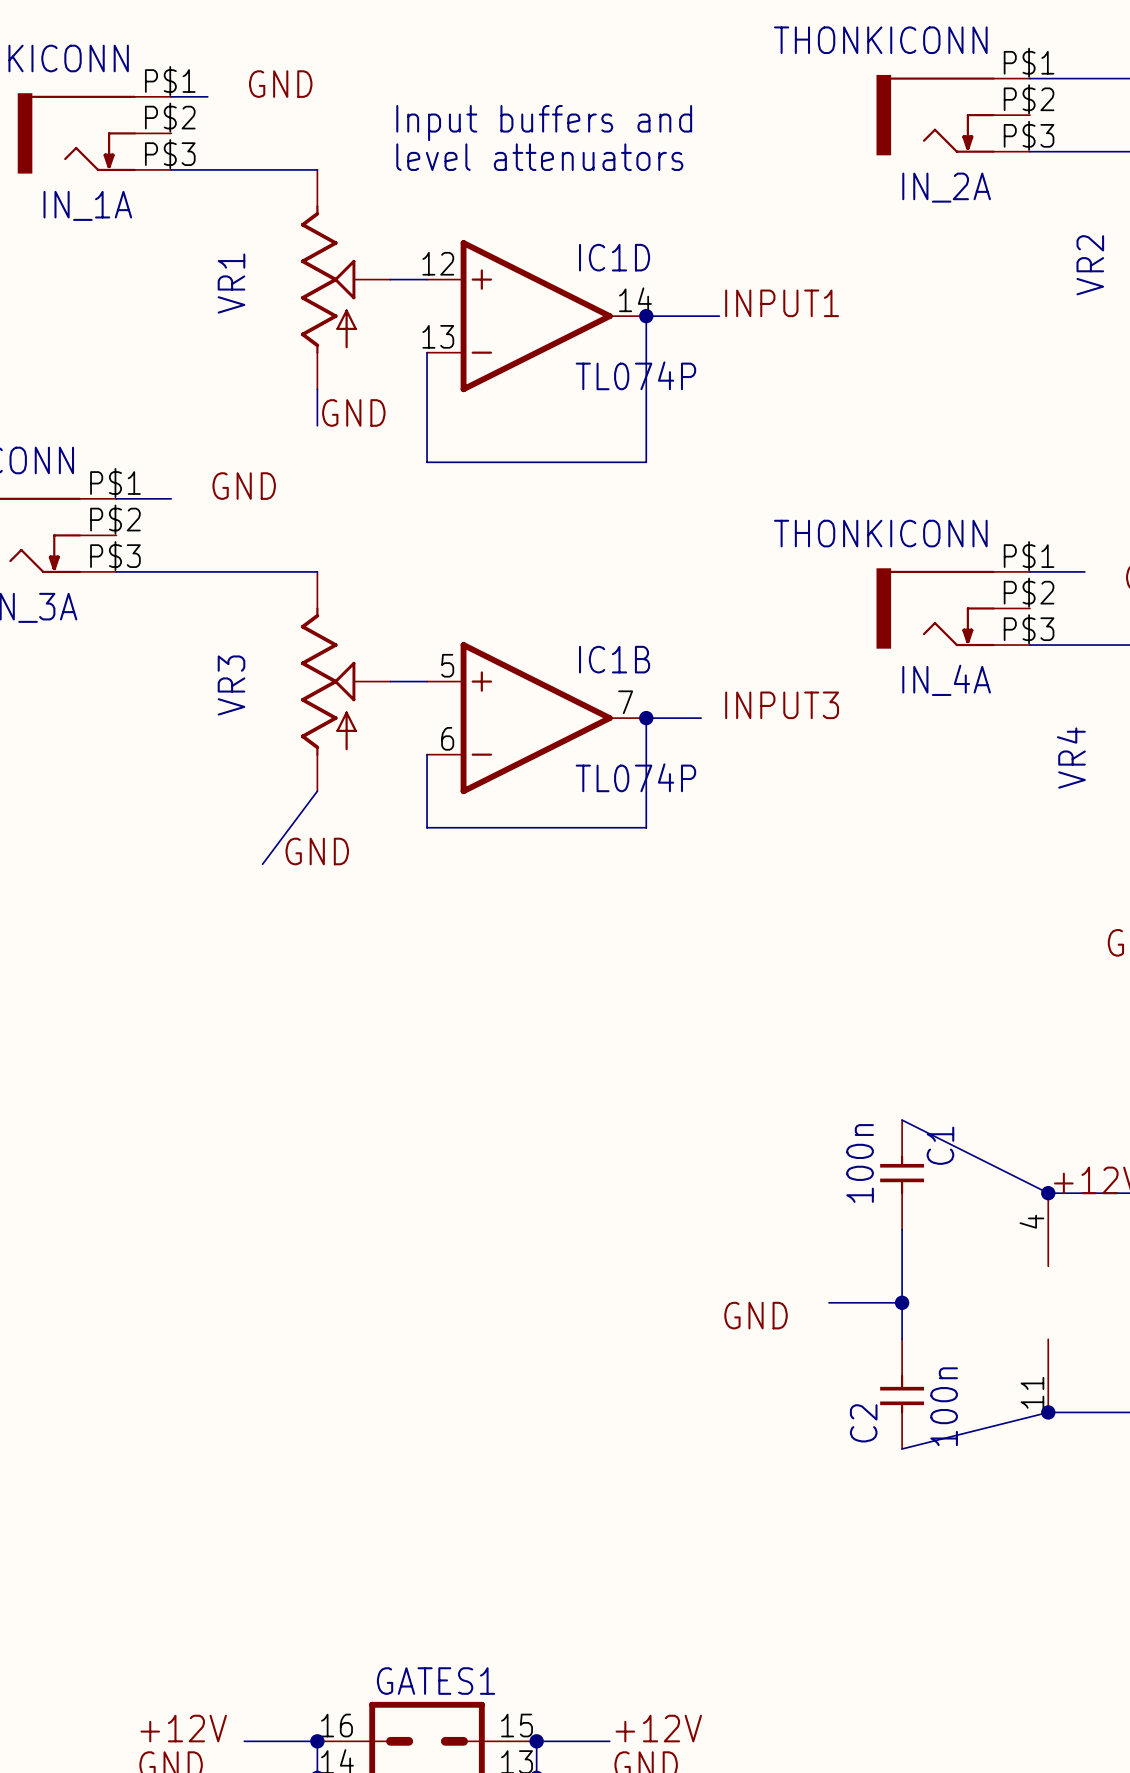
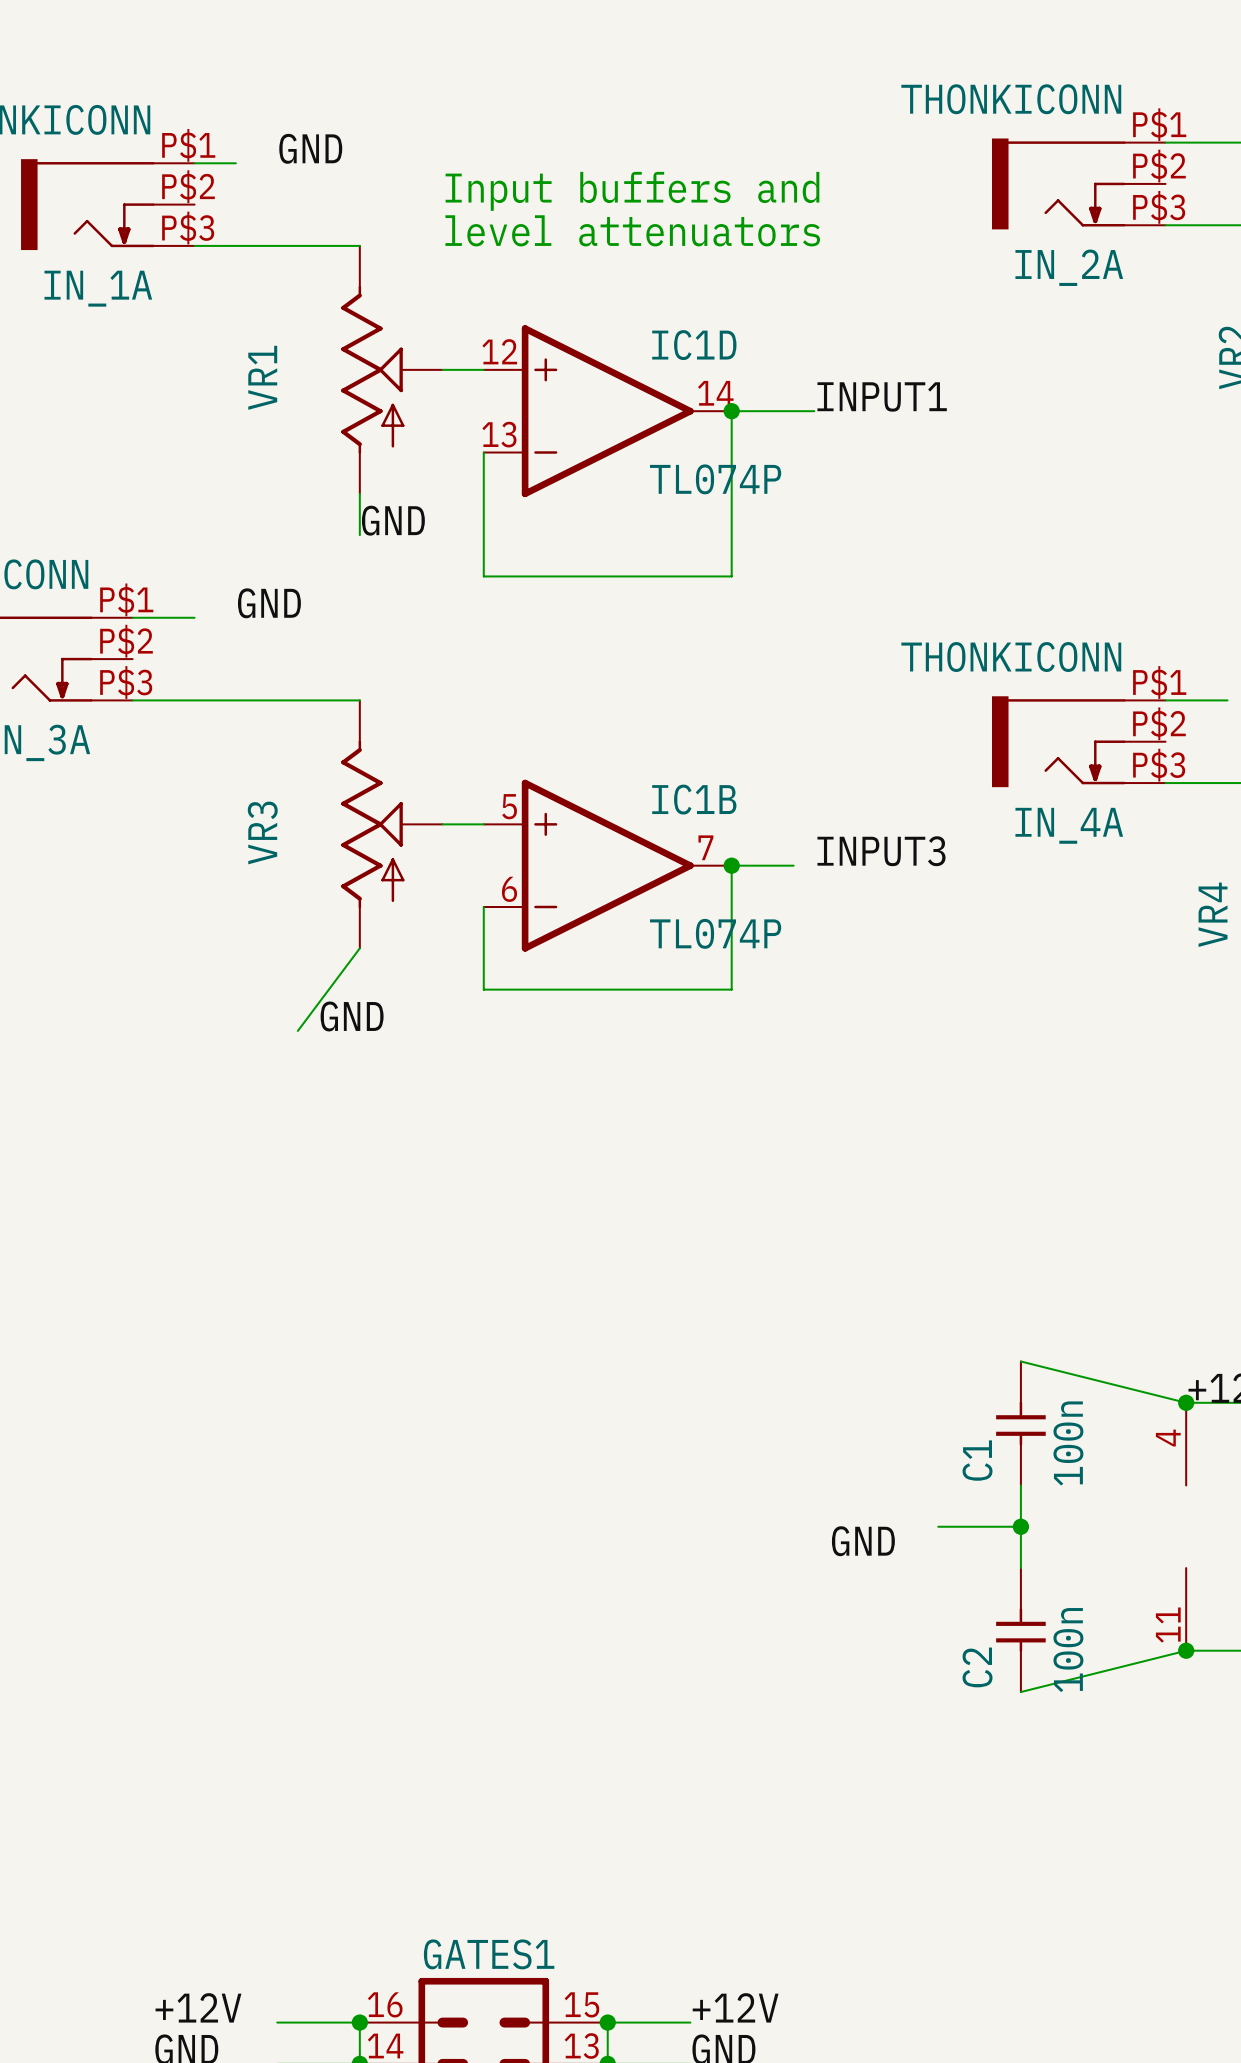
wire: (902, 1120) (1048, 1193) -> (1020, 1361) (1186, 1402)
C1 rotation: 0° (902, 1174) -> 180° (1020, 1423)

